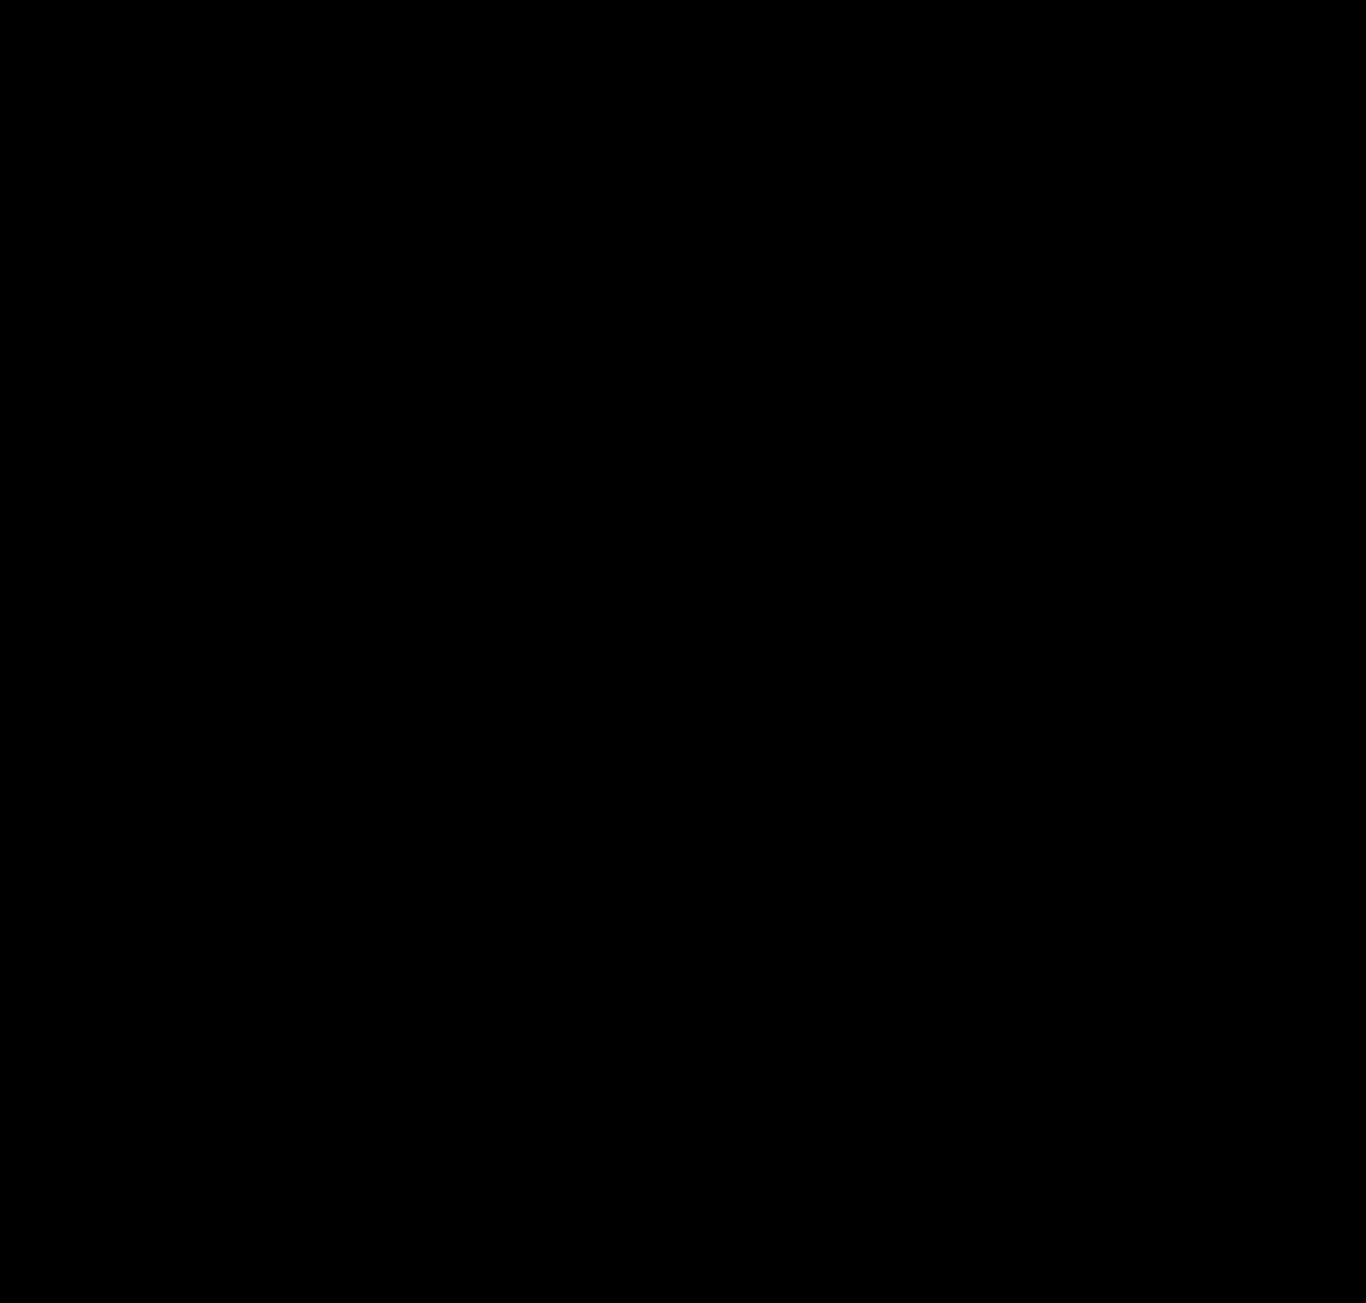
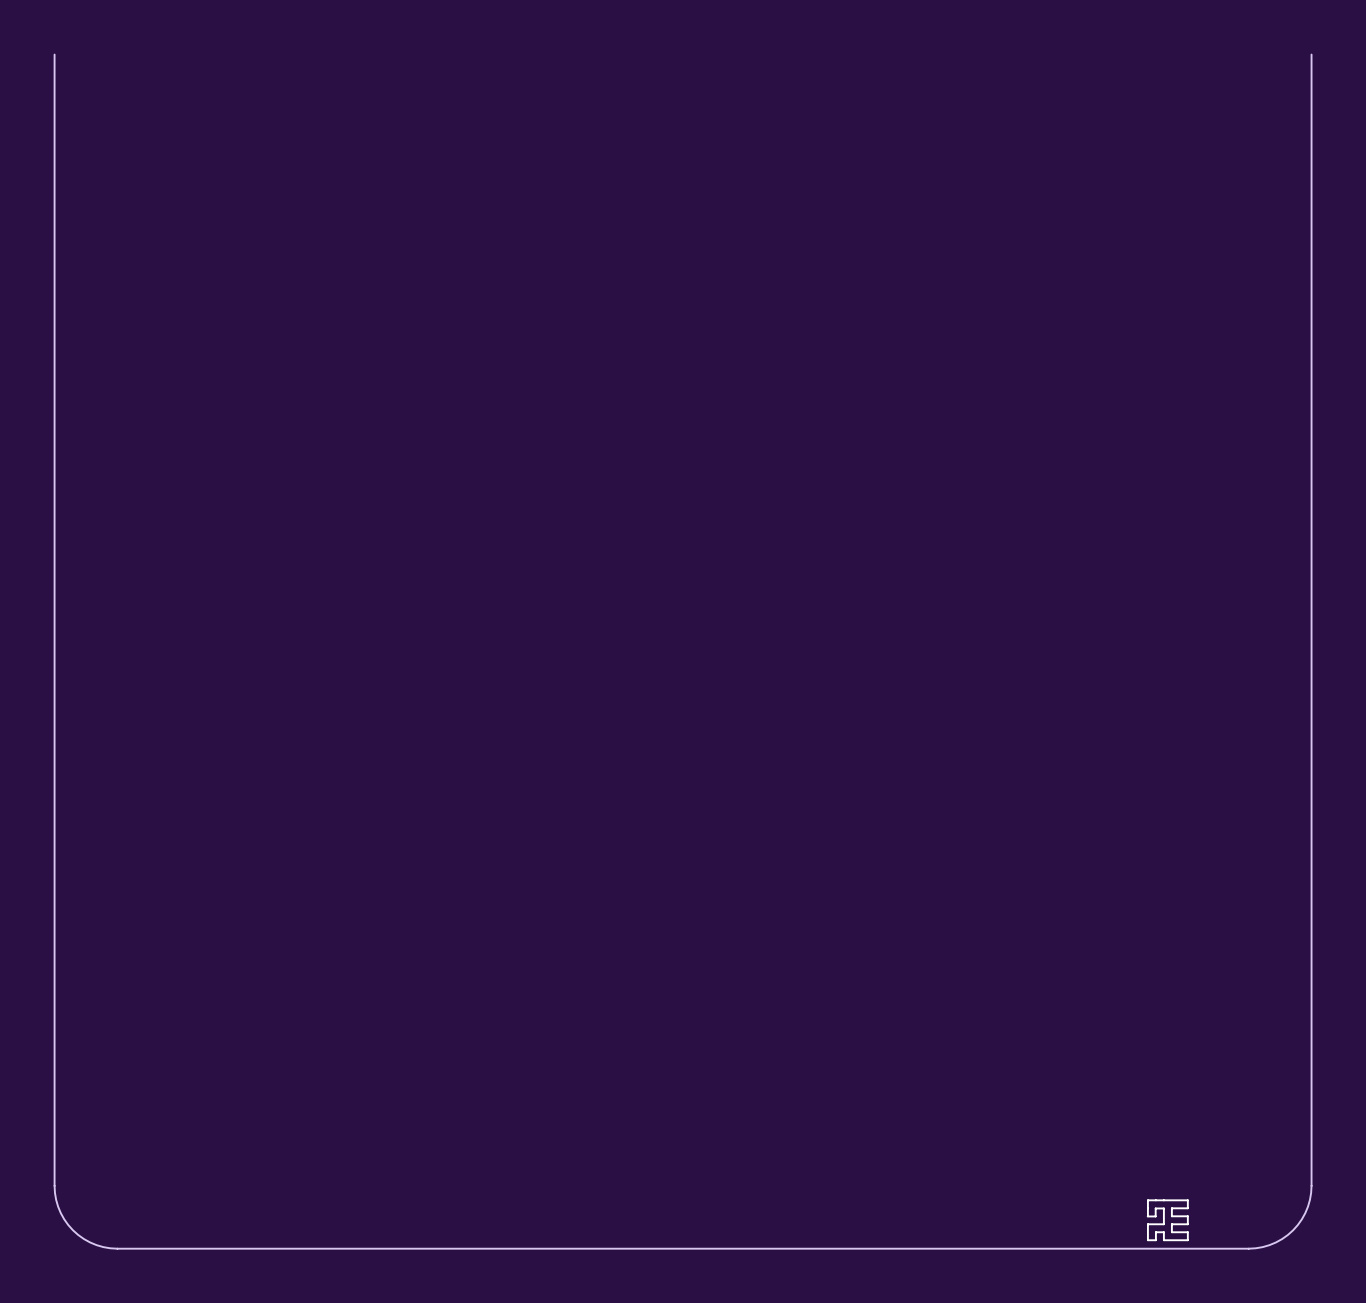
board edge: none -> (54, 54) (54, 1185) (58, 1206) (64, 1219) (72, 1230) (90, 1242) (103, 1247) (117, 1248) (1248, 1248) (1269, 1245) (1282, 1239) (1293, 1230) (1305, 1213) (1309, 1199) (1311, 1185) (1311, 54)
line: none -> (1147, 1216) (1147, 1200) (1187, 1200) (1187, 1208) (1171, 1208) (1171, 1216) (1187, 1216) (1187, 1224) (1171, 1224) (1171, 1232) (1187, 1232) (1187, 1240) (1163, 1240) (1163, 1232) (1155, 1232) (1155, 1240) (1147, 1240) (1147, 1224) (1163, 1224) (1163, 1208) (1155, 1208) (1155, 1216) (1147, 1216)

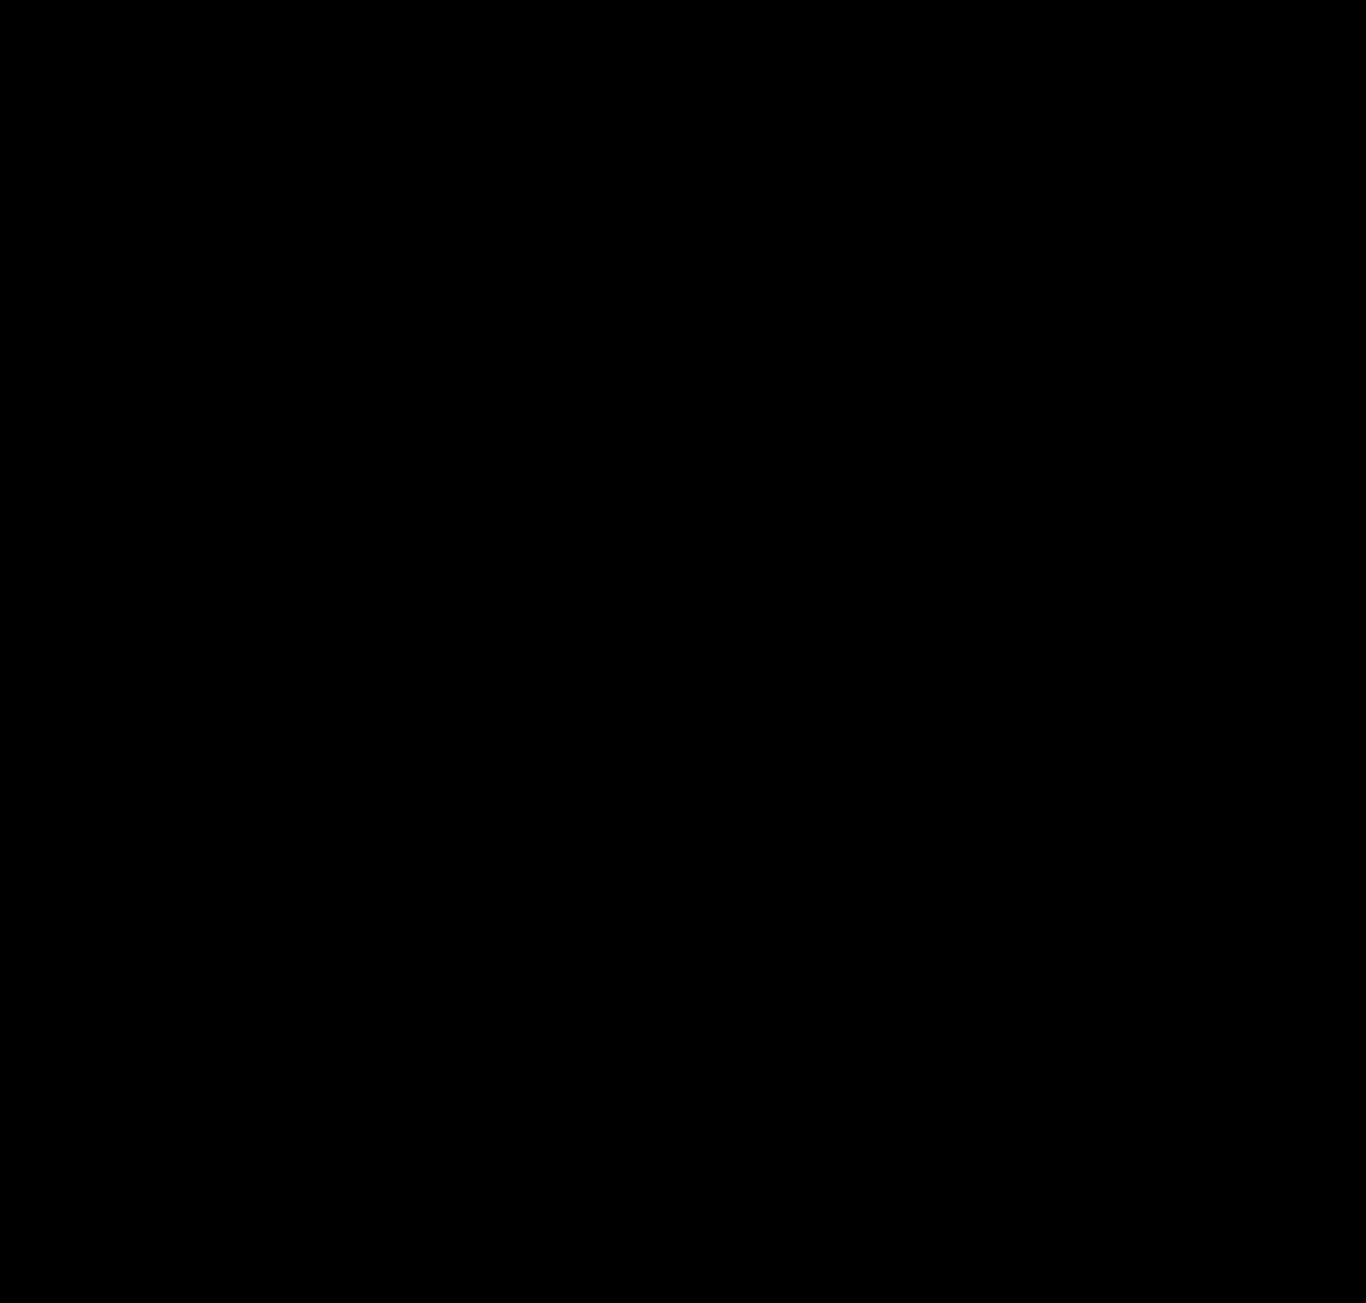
board edge: (54, 54) (54, 1185) (58, 1206) (64, 1219) (72, 1230) (90, 1242) (103, 1247) (117, 1248) (1248, 1248) (1269, 1245) (1282, 1239) (1293, 1230) (1305, 1213) (1309, 1199) (1311, 1185) (1311, 54) -> none
line: (1147, 1216) (1147, 1200) (1187, 1200) (1187, 1208) (1171, 1208) (1171, 1216) (1187, 1216) (1187, 1224) (1171, 1224) (1171, 1232) (1187, 1232) (1187, 1240) (1163, 1240) (1163, 1232) (1155, 1232) (1155, 1240) (1147, 1240) (1147, 1224) (1163, 1224) (1163, 1208) (1155, 1208) (1155, 1216) (1147, 1216) -> none

